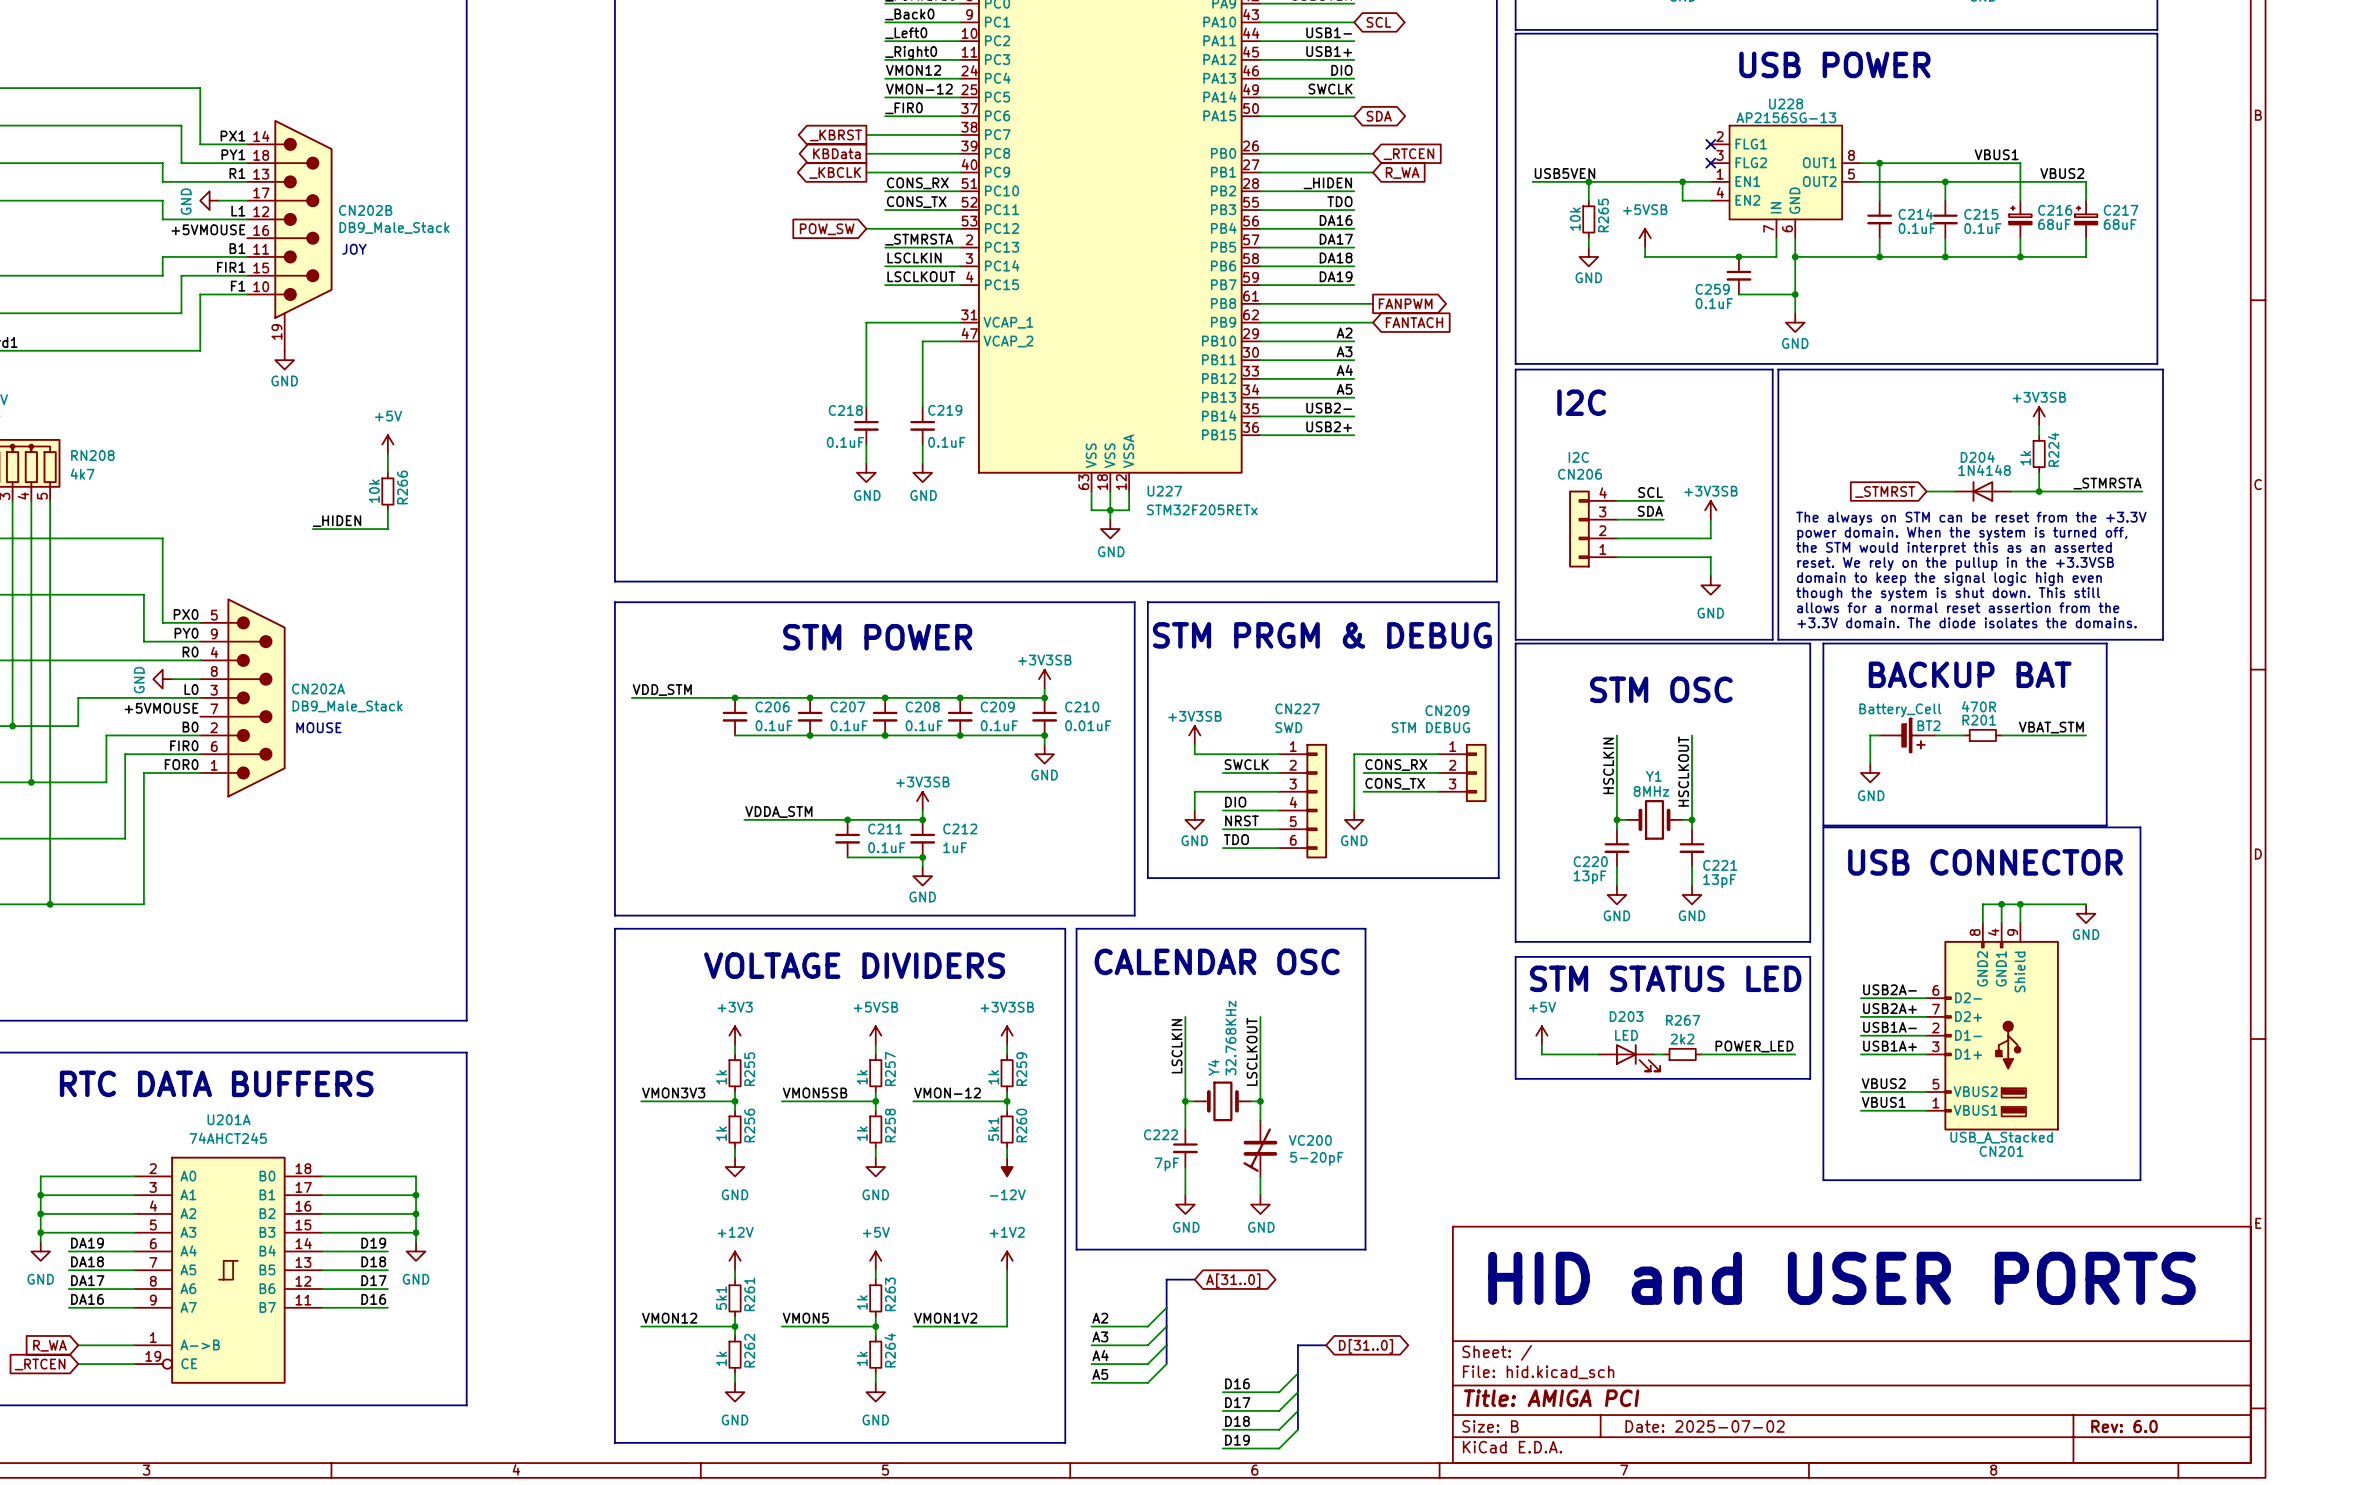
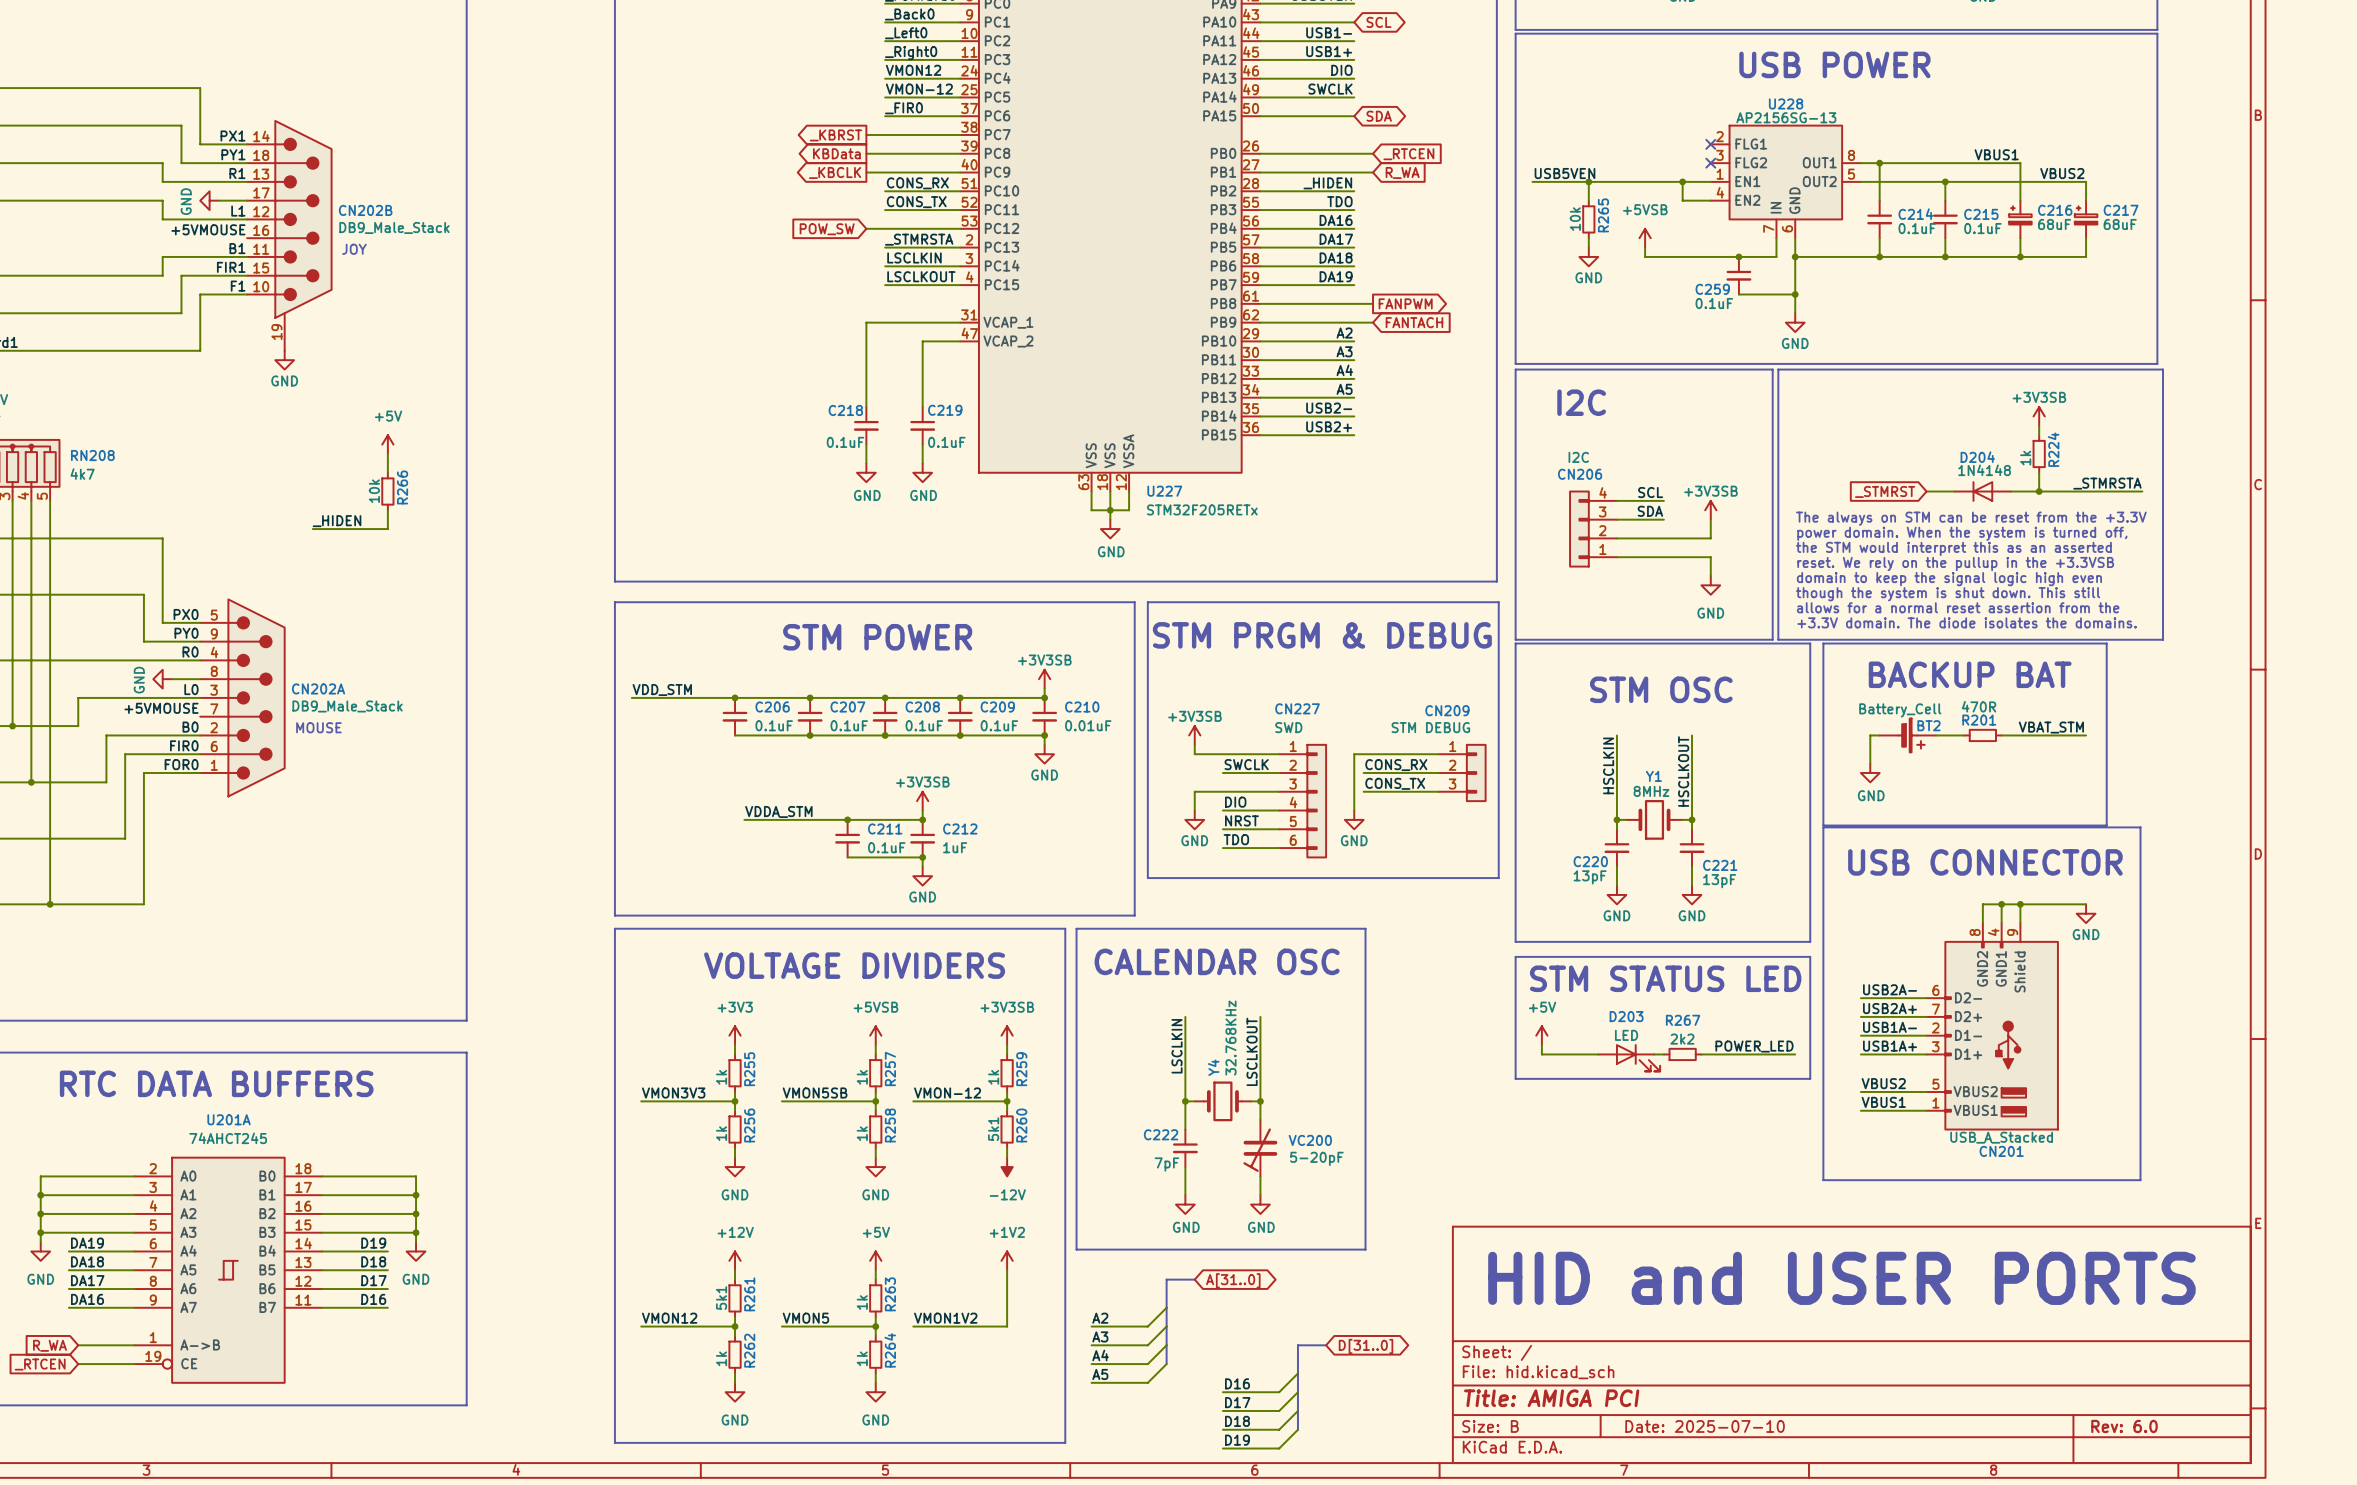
title block: Date: 2025-07-02 (1705, 1426) -> Date: 2025-07-10 (1705, 1426)

